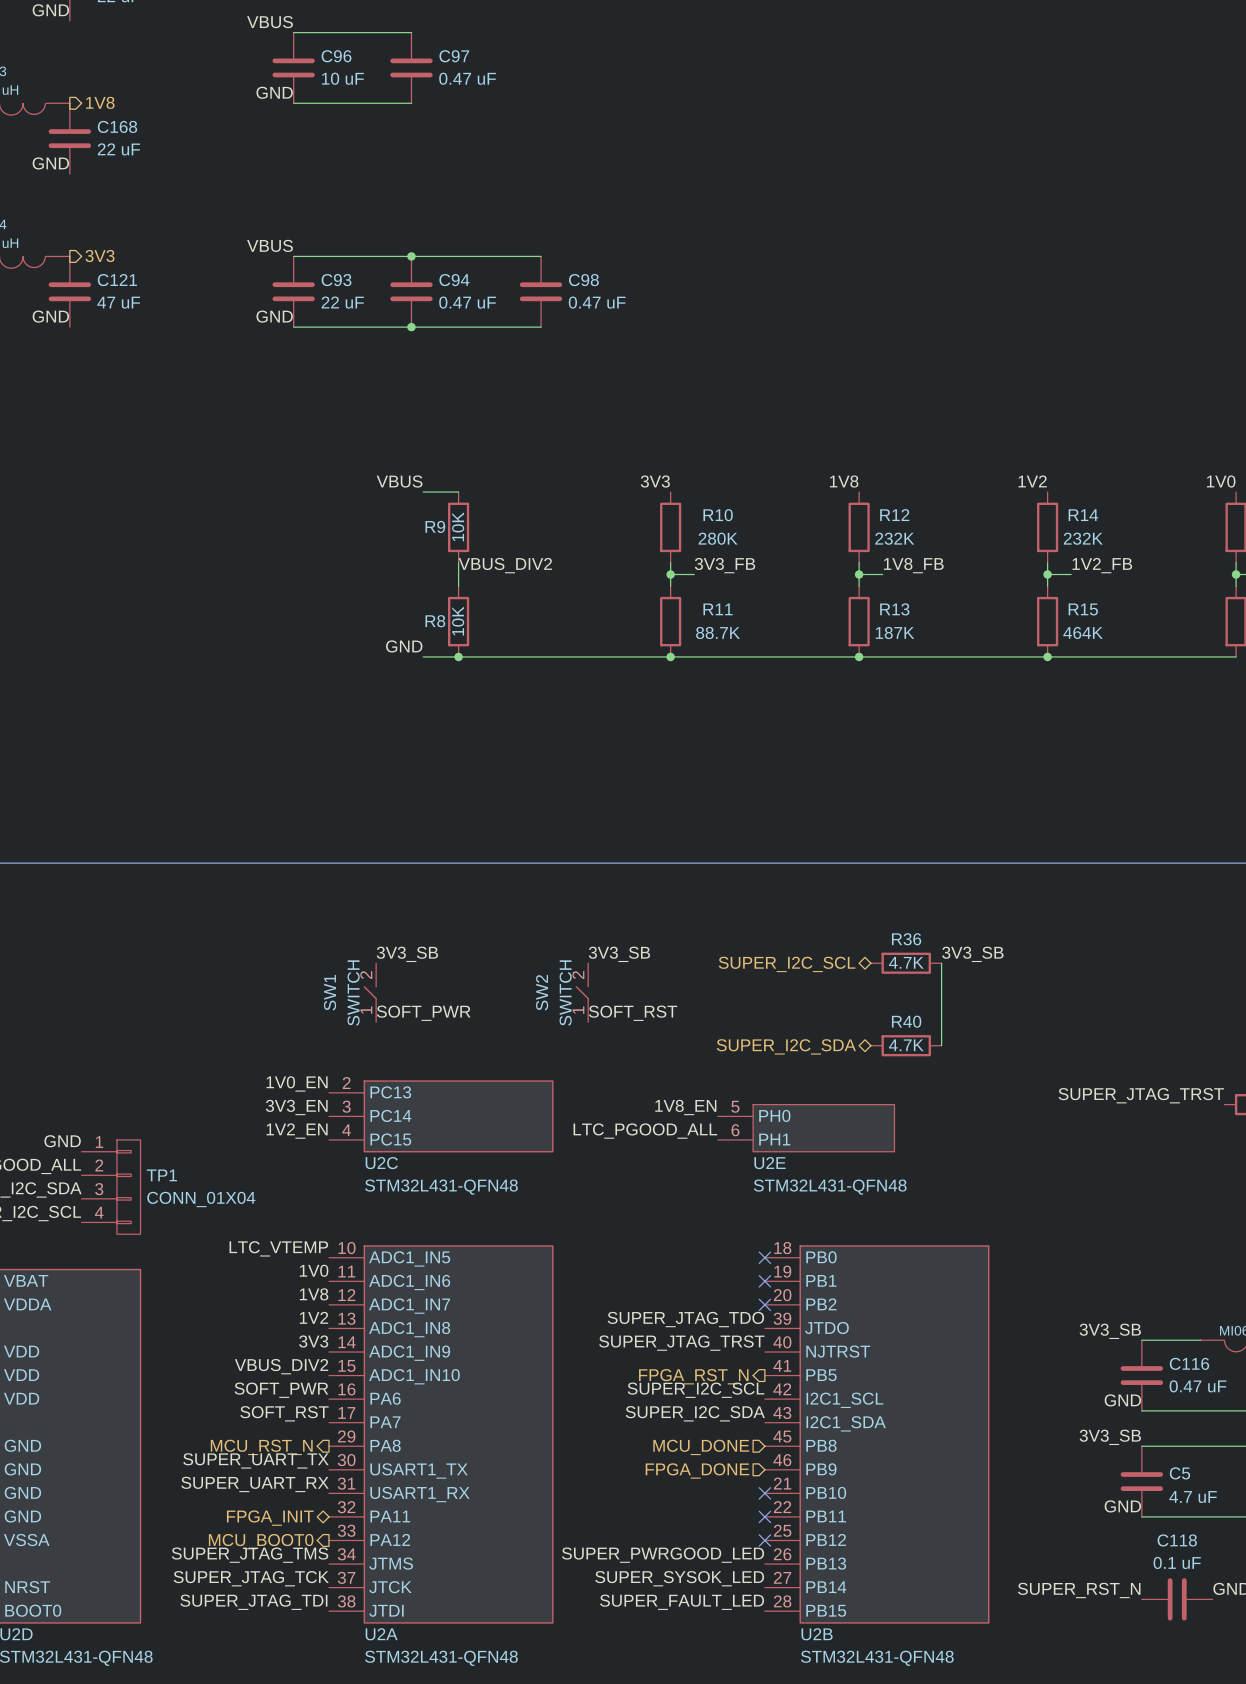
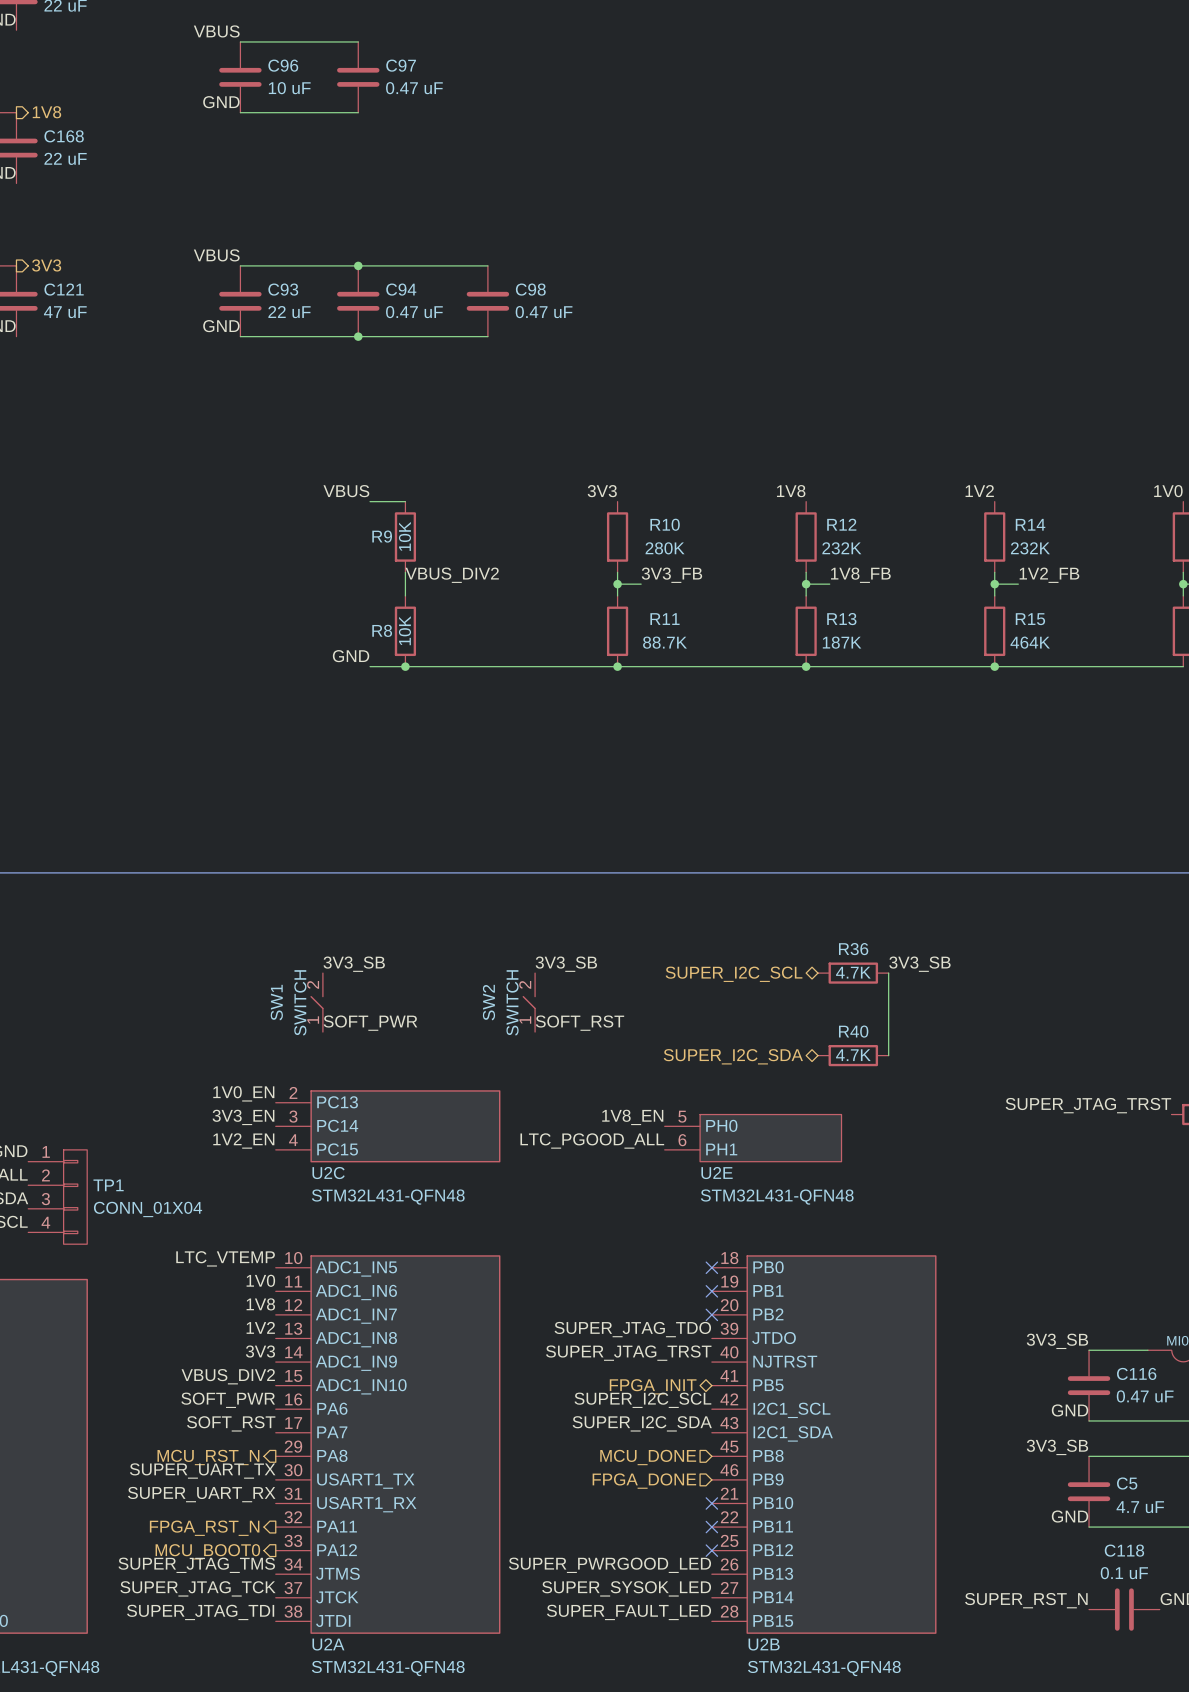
hierarchical label shape: output (693, 1376) -> bidirectional (653, 1386)
hierarchical label: FPGA_RST_N (693, 1376) -> FPGA_INIT (653, 1386)
hierarchical label shape: bidirectional (270, 1518) -> output (204, 1528)
hierarchical label: FPGA_INIT (270, 1518) -> FPGA_RST_N (204, 1528)

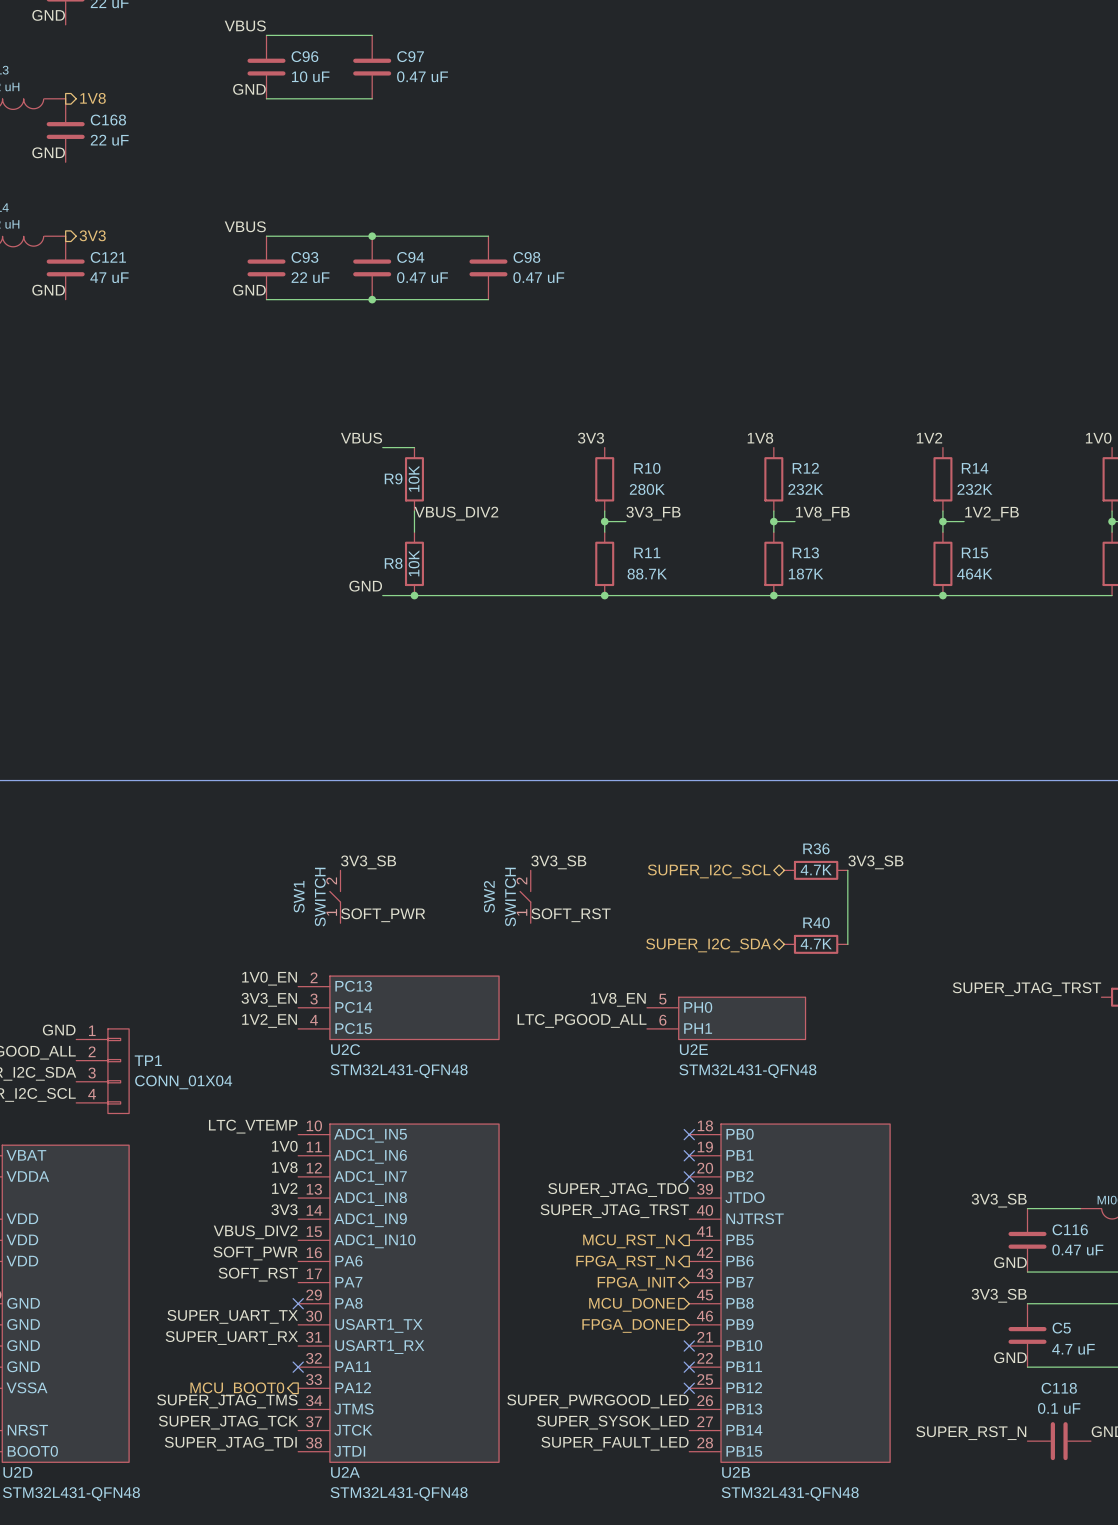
hierarchical label shape: bidirectional (653, 1386) -> output (628, 1241)
hierarchical label: FPGA_INIT (653, 1386) -> MCU_RST_N (628, 1241)
label: SUPER_I2C_SCL (642, 1400) -> none
hierarchical label: none -> FPGA_RST_N (625, 1262)
U2B pin name: I2C1_SCL (791, 1410) -> PB6 (740, 1261)
label: SUPER_I2C_SDA (642, 1423) -> none
hierarchical label: none -> FPGA_INIT (636, 1283)
U2B pin name: I2C1_SDA (793, 1433) -> PB7 (739, 1282)
no-connect mark: none -> (298, 1303)
hierarchical label: MCU_RST_N (208, 1457) -> none
no-connect mark: none -> (298, 1367)
hierarchical label: FPGA_RST_N (204, 1528) -> none

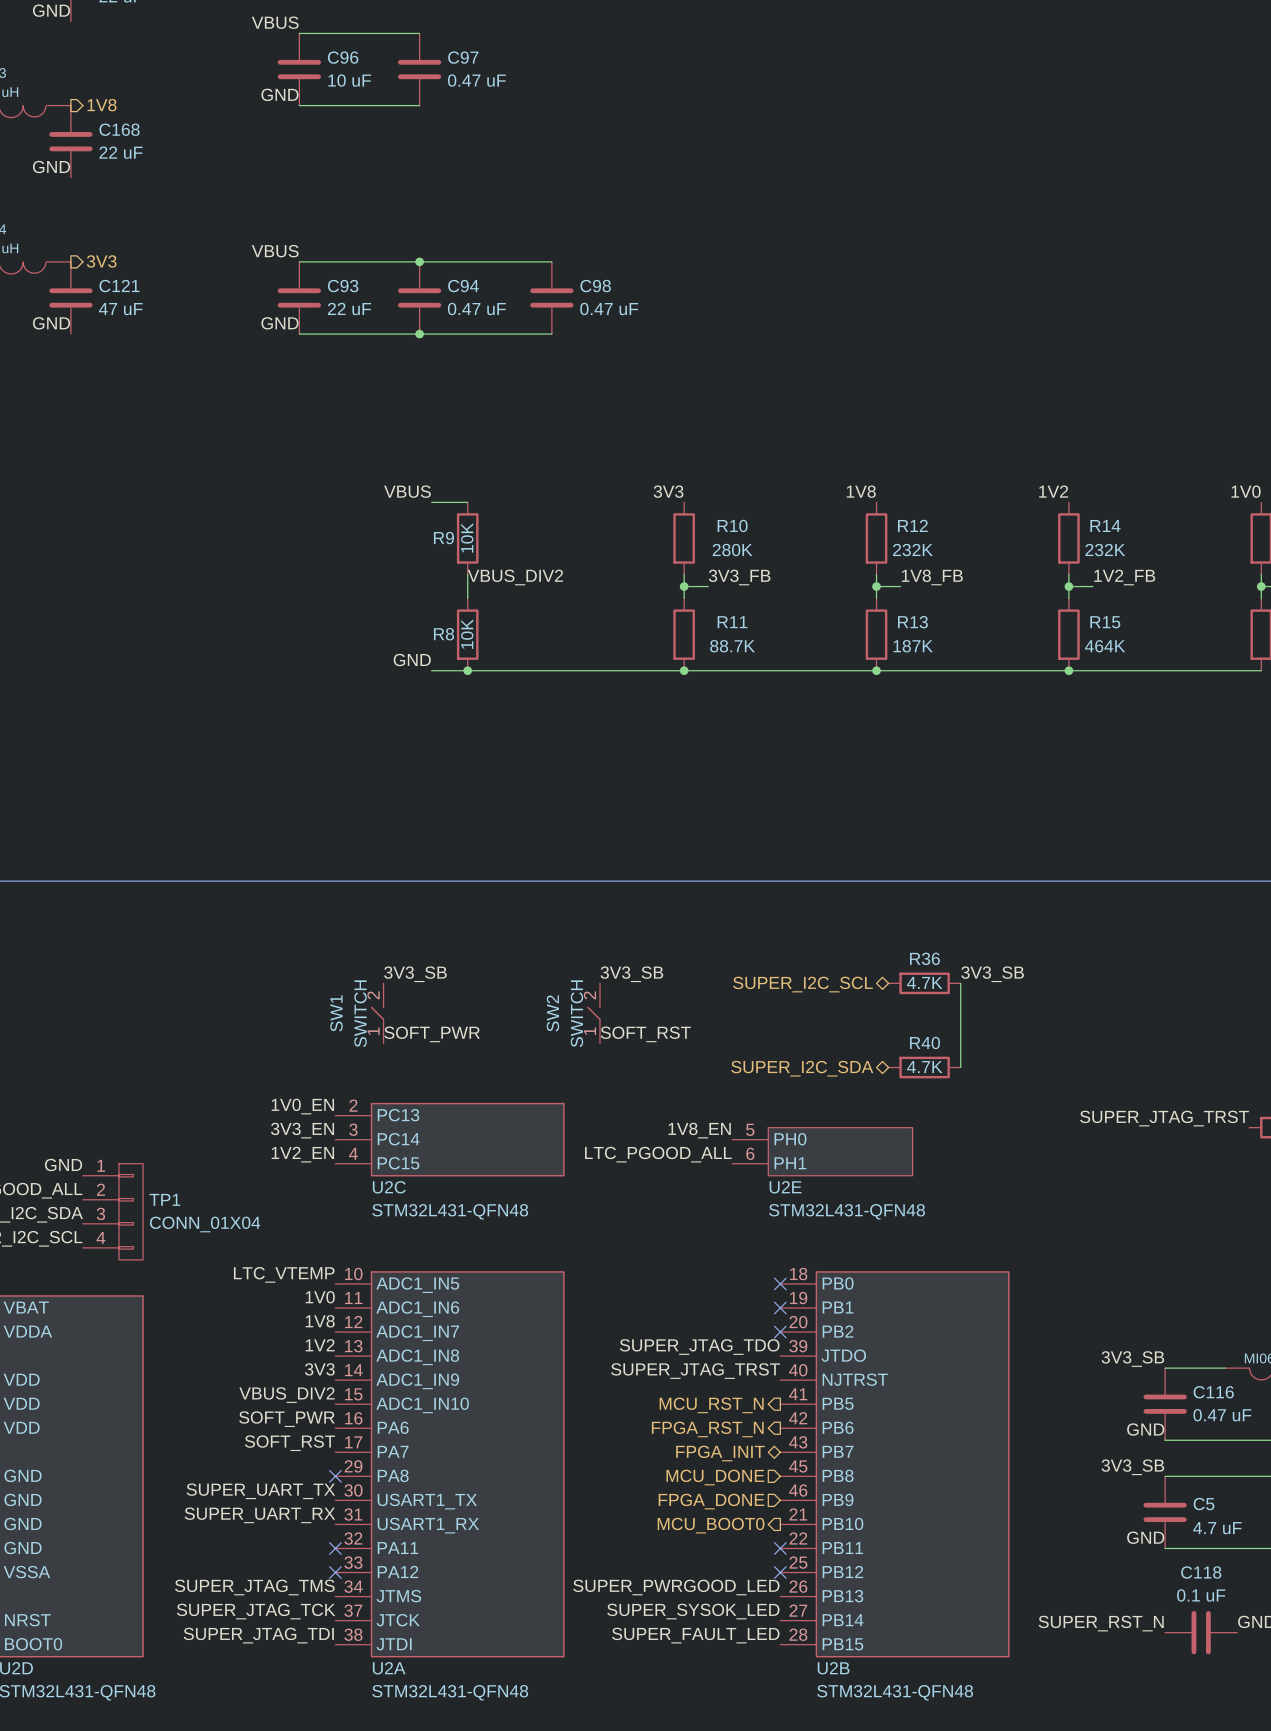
no-connect mark: (689, 1346) -> none
hierarchical label: none -> MCU_BOOT0 (711, 1525)
no-connect mark: none -> (335, 1572)
hierarchical label: MCU_BOOT0 (237, 1389) -> none

